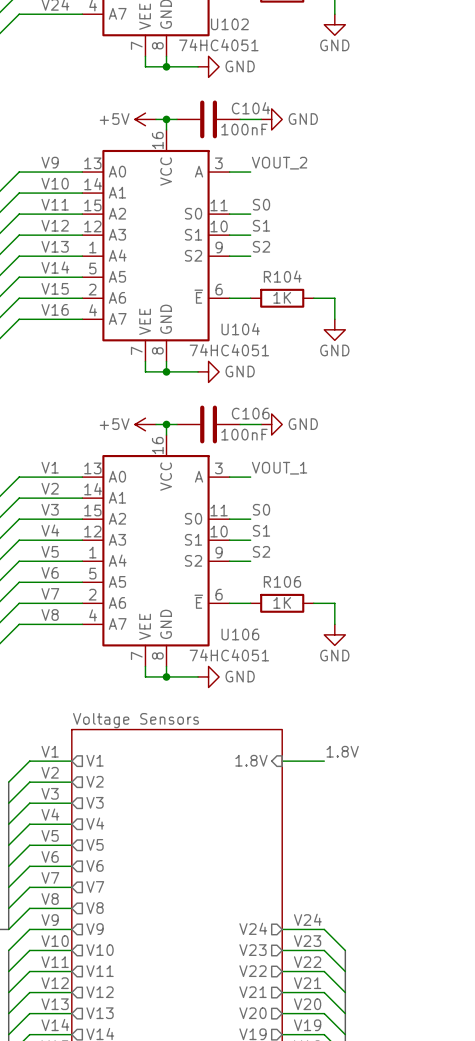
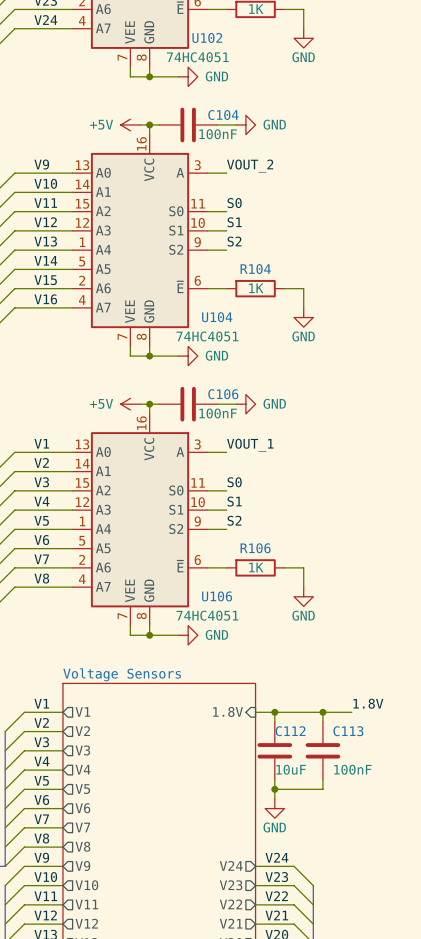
label position: 1.8V (342, 751) -> 1.8V (368, 703)
wire: none -> (274, 712) (274, 721)
junction: none -> (274, 712)
wire: none -> (294, 712) (351, 712)
wire: none -> (322, 712) (322, 721)
junction: none -> (322, 712)
C112: none -> 10uF (274, 750)
C113: none -> 100nF (322, 750)
wire: none -> (274, 779) (274, 798)
wire: none -> (322, 779) (322, 789) (274, 789)
junction: none -> (274, 789)
power symbol: none -> GND (274, 808)

